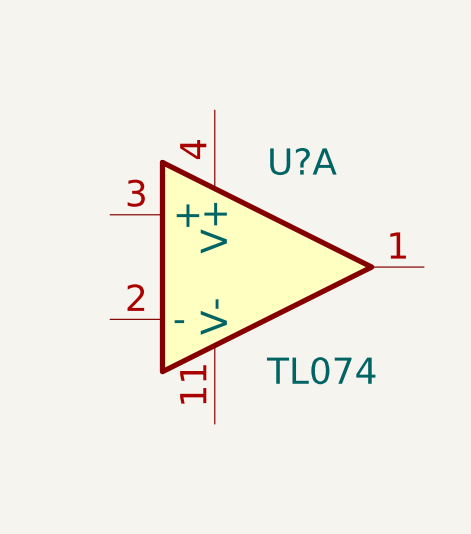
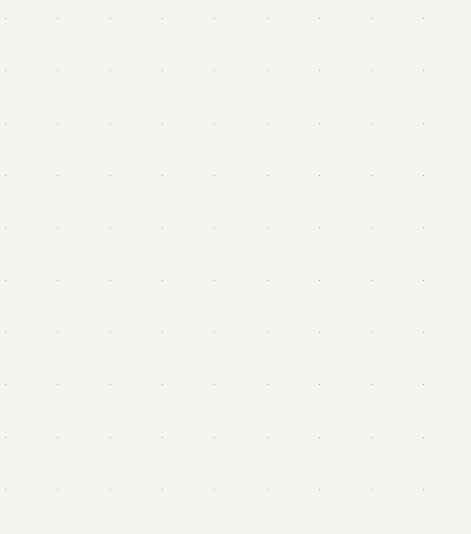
U?A: TL074 (267, 267) -> none

